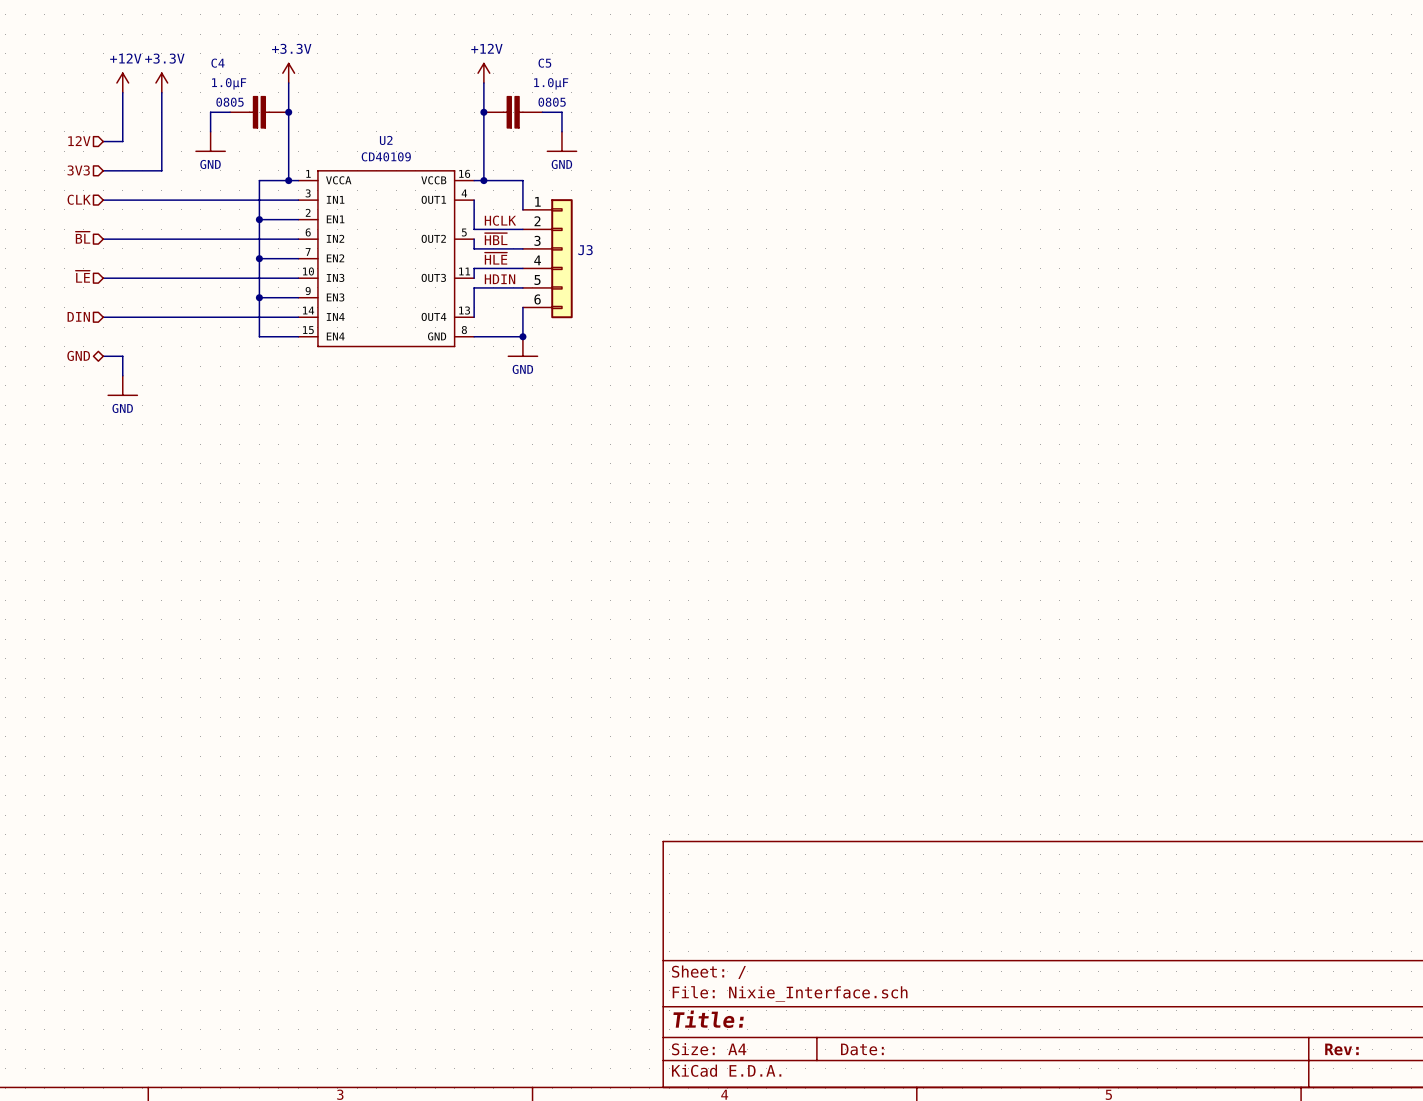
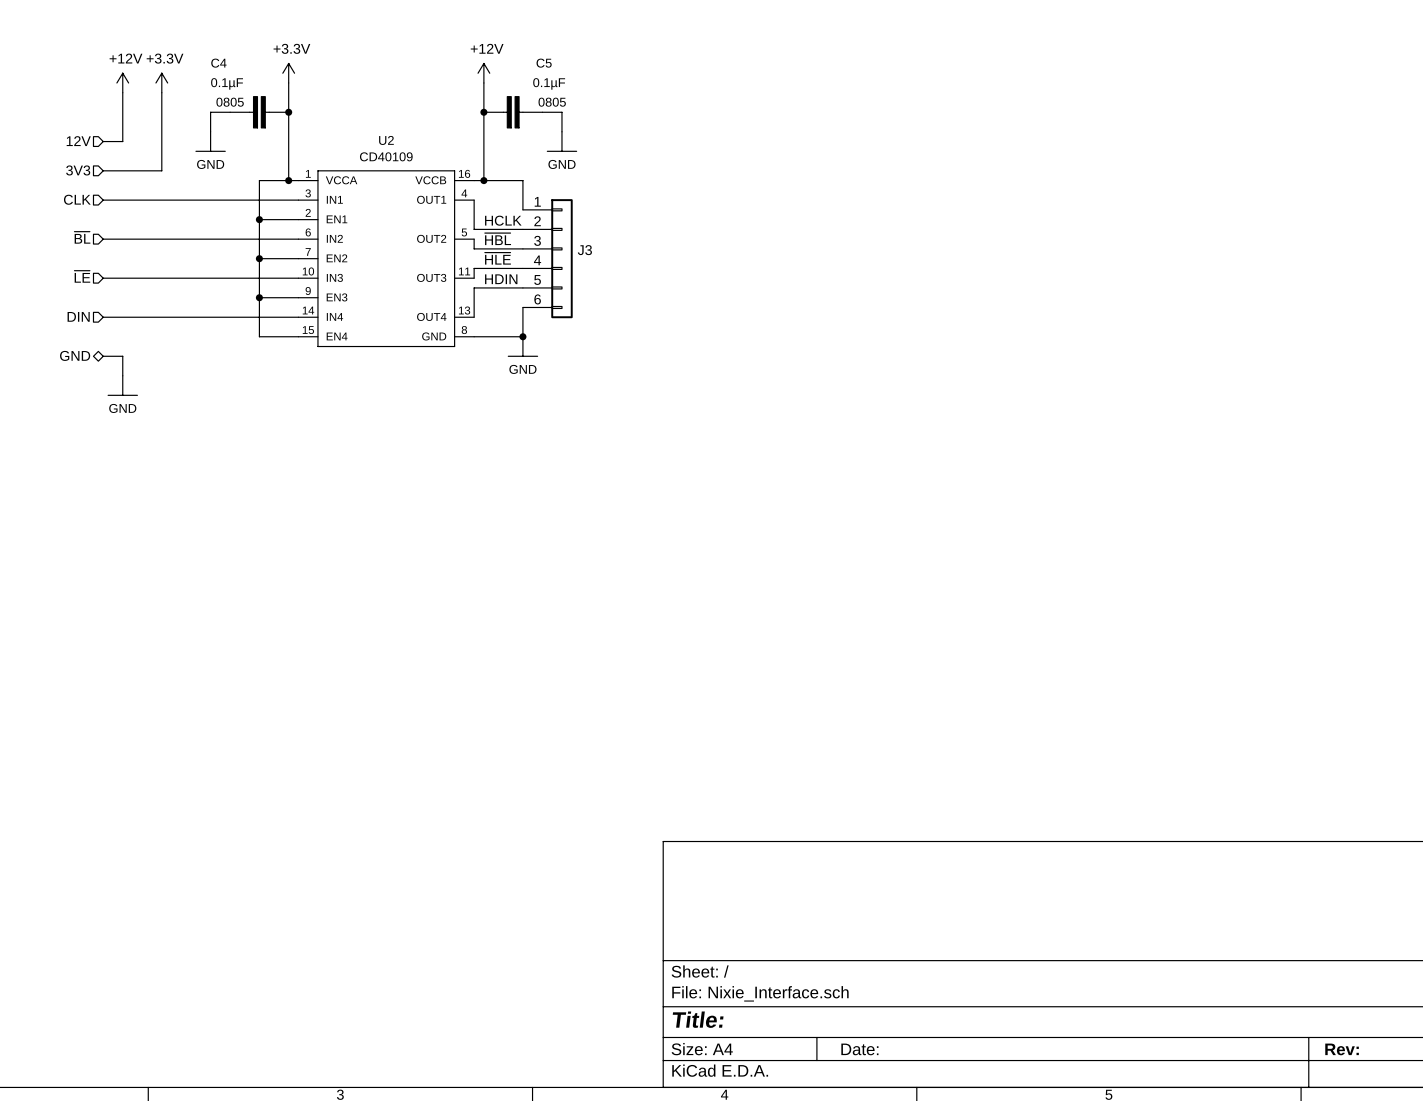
C4 value: 1.0µF (229, 83) -> 0.1µF (227, 83)
C5 value: 1.0µF (551, 83) -> 0.1µF (549, 83)

